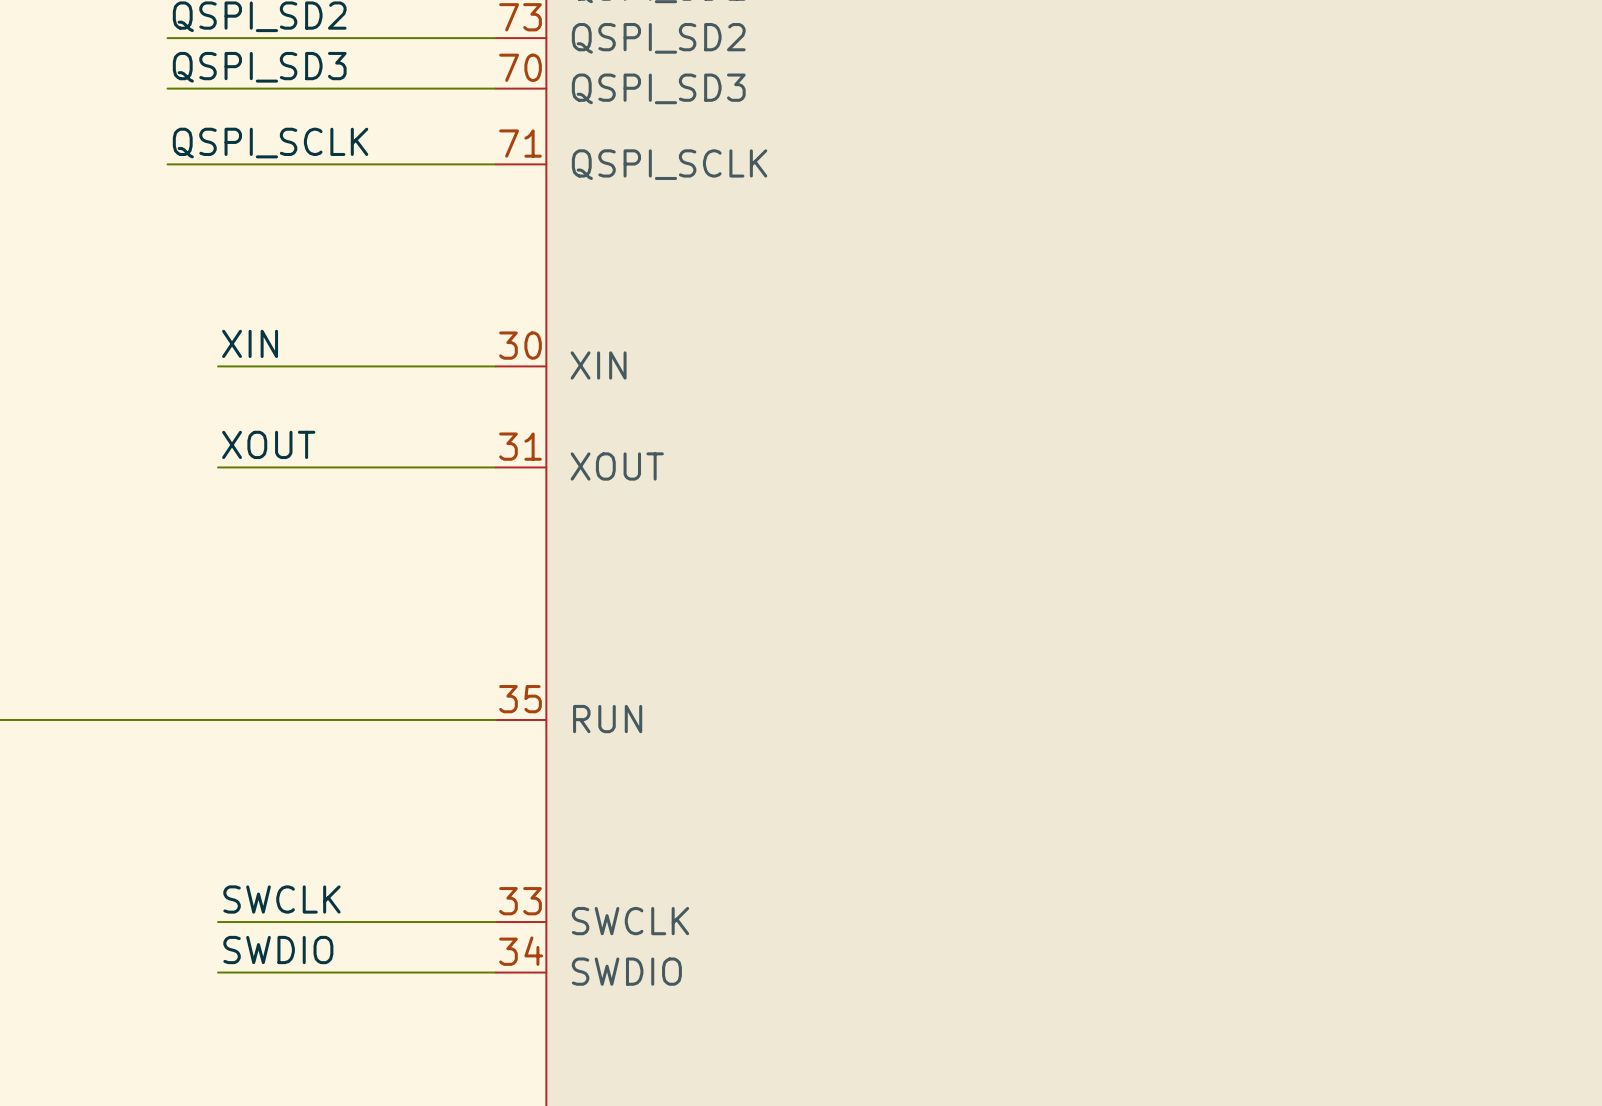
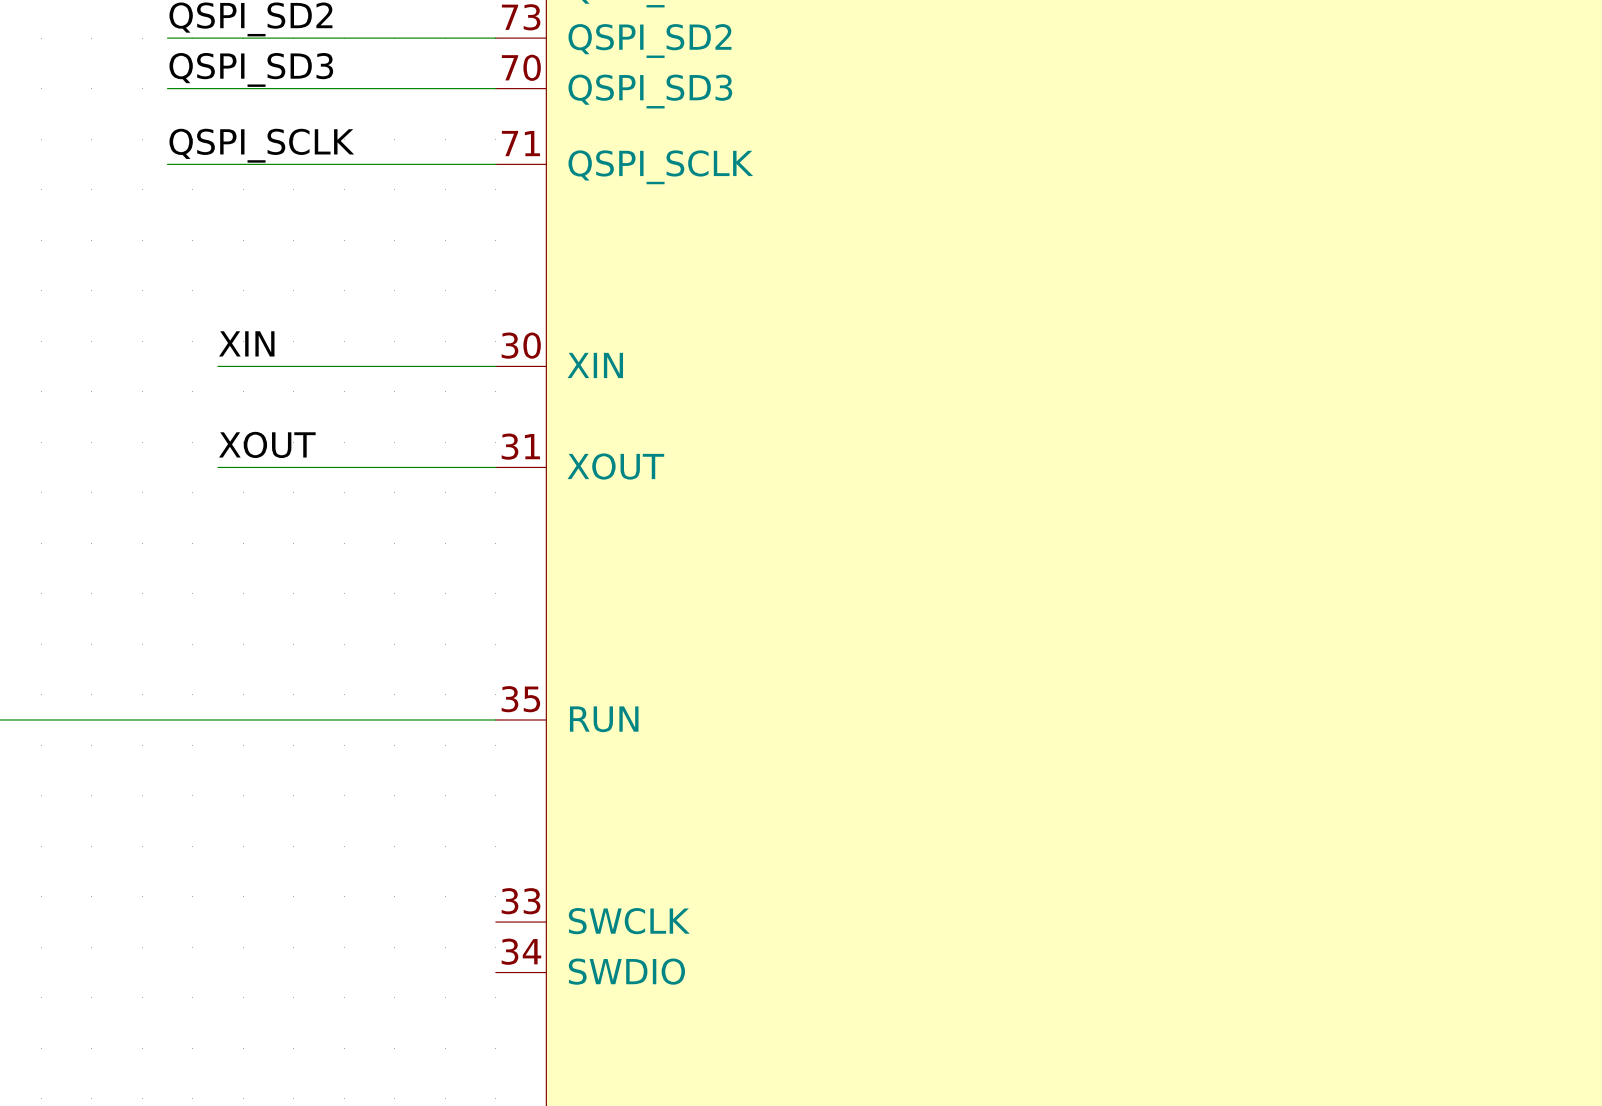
label: SWCLK (281, 899) -> none
wire: (218, 922) (495, 922) -> none
label: SWDIO (278, 950) -> none
wire: (218, 972) (495, 972) -> none

